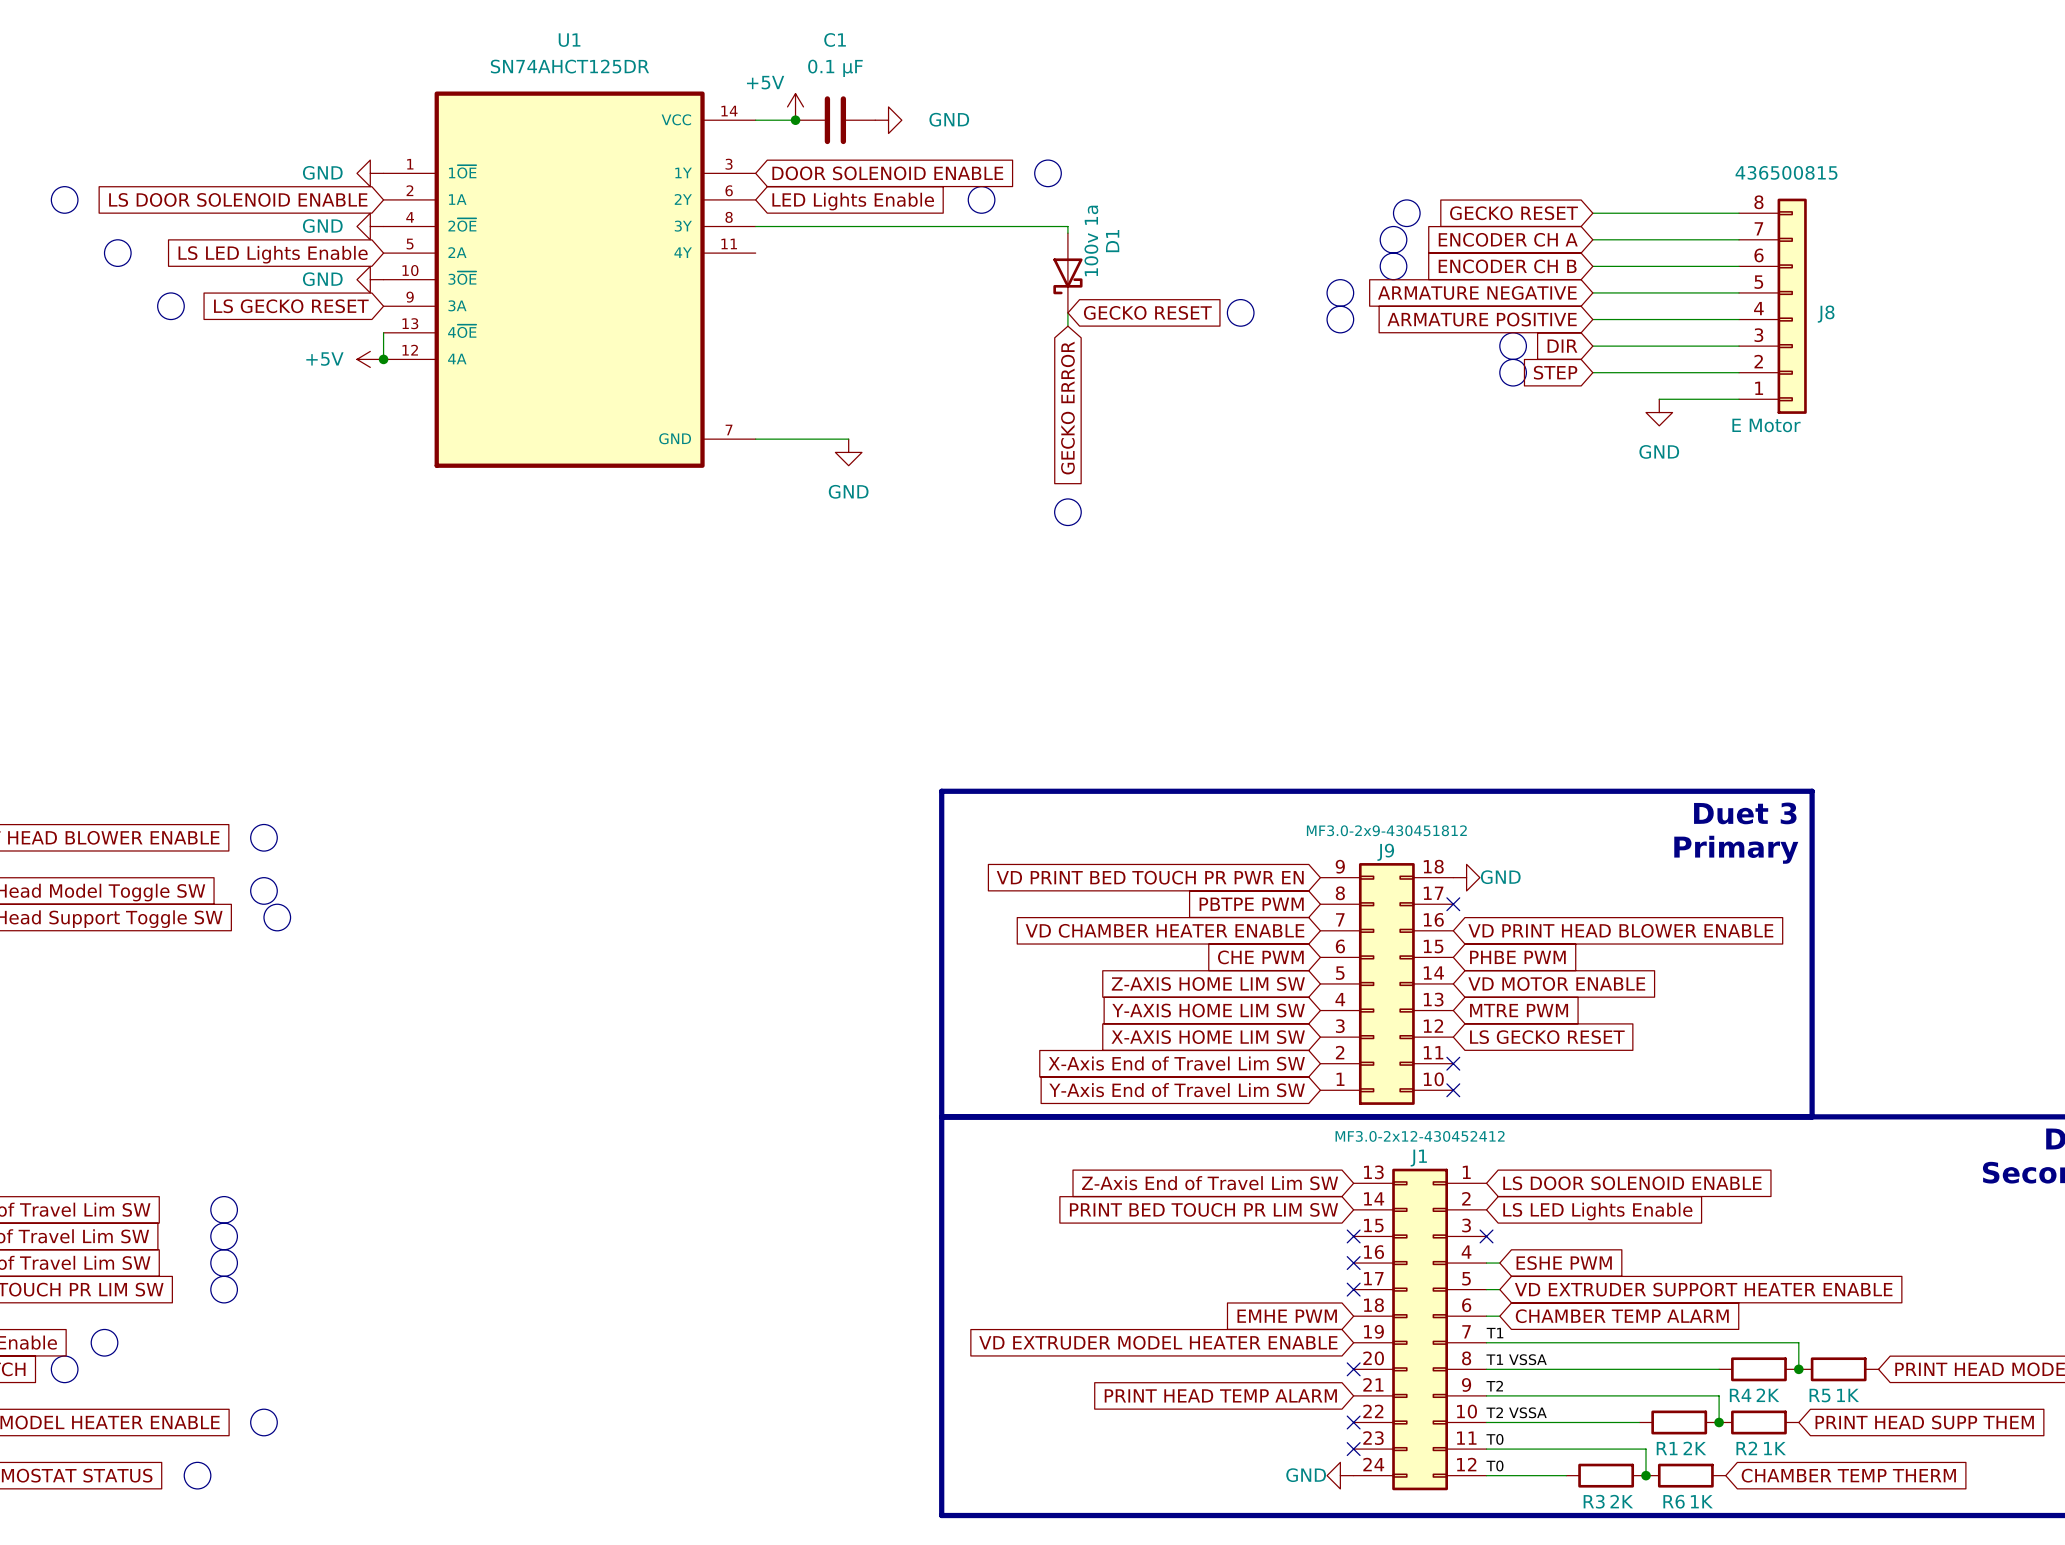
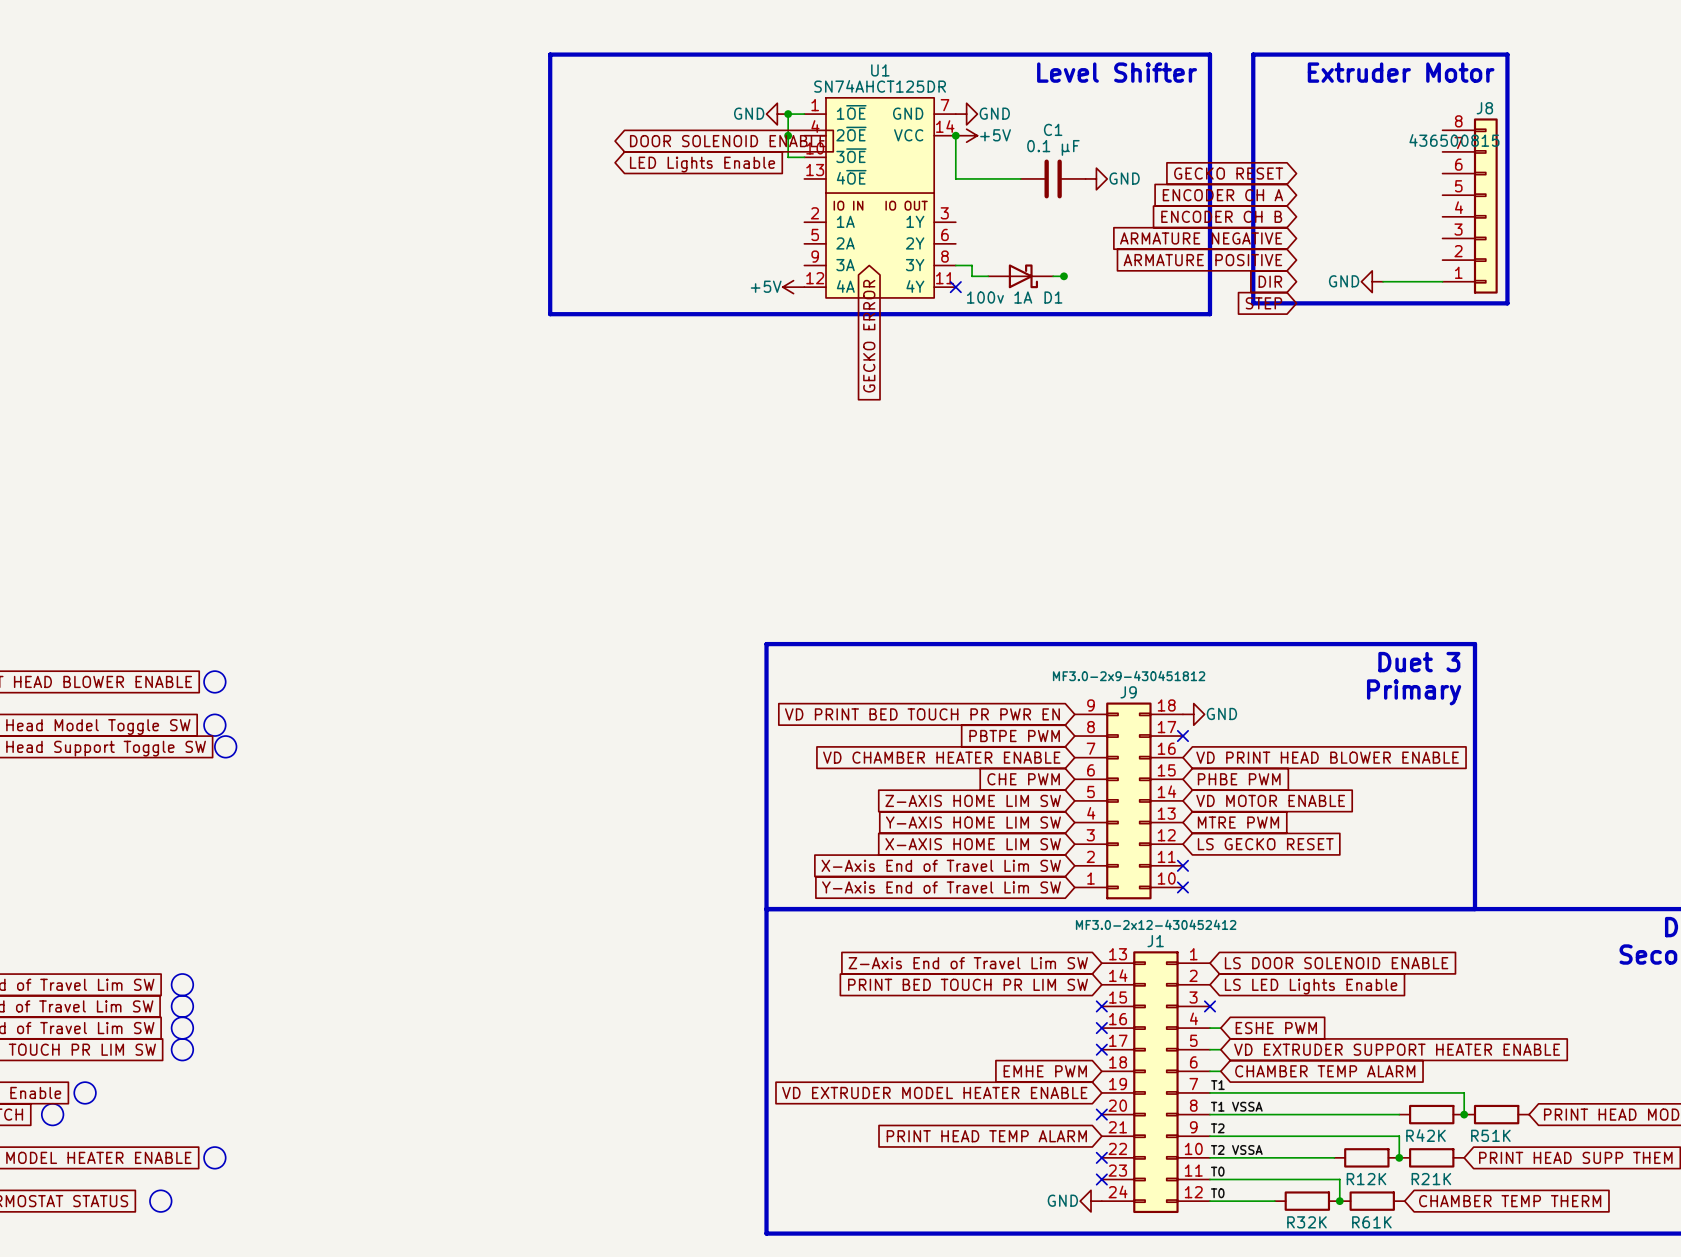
C1 name position: C1 (835, 39) -> C1 (1053, 129)
U1 name position: U1 (569, 40) -> U1 (880, 70)
U1 value position: SN74AHCT125DR (569, 66) -> SN74AHCT125DR (880, 86)
line: none -> (550, 54) (1209, 54) (1209, 314) (550, 314) (550, 54)
line: none -> (1253, 54) (1507, 54) (1507, 303) (1253, 303) (1253, 54)
C1 value position: 0.1 µF (835, 68) -> 0.1 µF (1053, 147)
text: none -> Level Shifter (1117, 72)
text: none -> Extruder Motor (1401, 72)
U1 symbol: [383, 91, 756, 468] -> [804, 97, 956, 298]
power symbol: +5V (795, 106) -> none
power symbol text position: GND (949, 119) -> GND (749, 113)
wire: (755, 120) (795, 120) -> none
junction: (795, 120) -> none
C1 position: (835, 120) -> (1053, 178)
power symbol rotation: 0° (888, 120) -> 180° (777, 114)
power symbol position: GND (888, 120) -> GND (777, 114)
junction: none -> (788, 114)
wire: none -> (804, 114) (788, 114) (788, 157) (804, 157)
power symbol: none -> GND (966, 114)
drawing: [1034, 160, 1062, 187] -> none
junction: none -> (788, 135)
wire: none -> (955, 135) (955, 178) (1020, 178)
junction: none -> (955, 135)
power symbol: none -> +5V (966, 135)
power symbol: GND (370, 173) -> none
drawing: [51, 186, 78, 214] -> none
drawing: [968, 186, 995, 214] -> none
global label: LS DOOR SOLENOID ENABLE (238, 199) -> none
drawing: [1380, 199, 1421, 280] -> none
wire: (1592, 213) (1739, 213) -> none
power symbol: none -> GND (1096, 178)
power symbol: GND (370, 226) -> none
wire: (755, 226) (1067, 226) (1067, 233) -> none
drawing: [104, 239, 132, 267] -> none
wire: (1592, 239) (1739, 239) -> none
D1 value: 100v 1a (1091, 240) -> 100v 1A (999, 297)
D1 name position: D1 (1112, 241) -> D1 (1053, 297)
global label: LS LED Lights Enable (273, 254) -> none
wire: (1592, 266) (1739, 266) -> none
D1 position: (1067, 273) -> (1020, 276)
D1 rotation: 0° (1067, 276) -> 90° counterclockwise (1023, 276)
power symbol: GND (370, 279) -> none
drawing: [1327, 279, 1354, 333] -> none
drawing: [157, 292, 185, 320] -> none
wire: (1592, 292) (1739, 292) -> none
drawing: [1227, 299, 1254, 327] -> none
global label: LS GECKO RESET (291, 306) -> none
J8 position: (1772, 306) -> (1470, 206)
global label: GECKO RESET (1147, 312) -> none
J8 name position: J8 (1826, 314) -> J8 (1484, 108)
wire: (1592, 319) (1739, 319) -> none
wire: none -> (955, 265) (972, 265) (972, 276) (988, 276)
wire: (383, 332) (383, 359) -> none
drawing: [1499, 332, 1527, 386] -> none
wire: none -> (1053, 276) (1063, 276)
junction: none -> (1063, 276)
wire: (1592, 346) (1699, 346) -> none
power symbol: none -> +5V (793, 287)
no-connect mark: none -> (955, 287)
power symbol: +5V (370, 359) -> none
junction: (383, 359) -> none
wire: (1659, 399) (1739, 399) -> none
power symbol rotation: 0° (1659, 412) -> 90° clockwise (1372, 281)
power symbol position: GND (1659, 412) -> GND (1372, 281)
J8 text: E Motor (1766, 425) -> none
wire: (755, 439) (848, 439) -> none
power symbol: GND (848, 452) -> none
drawing: [1054, 498, 1082, 526] -> none

